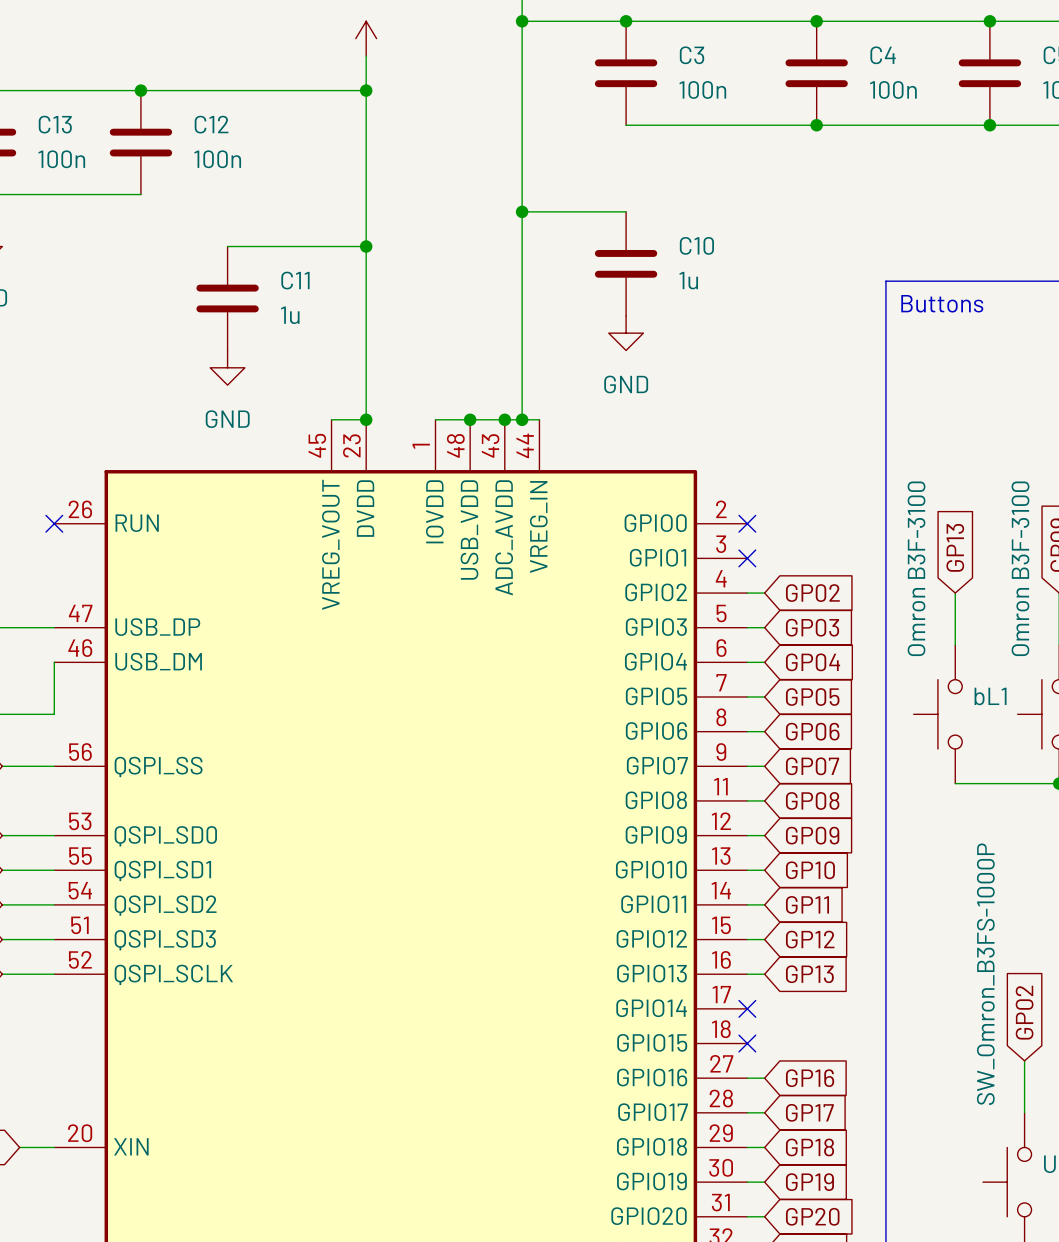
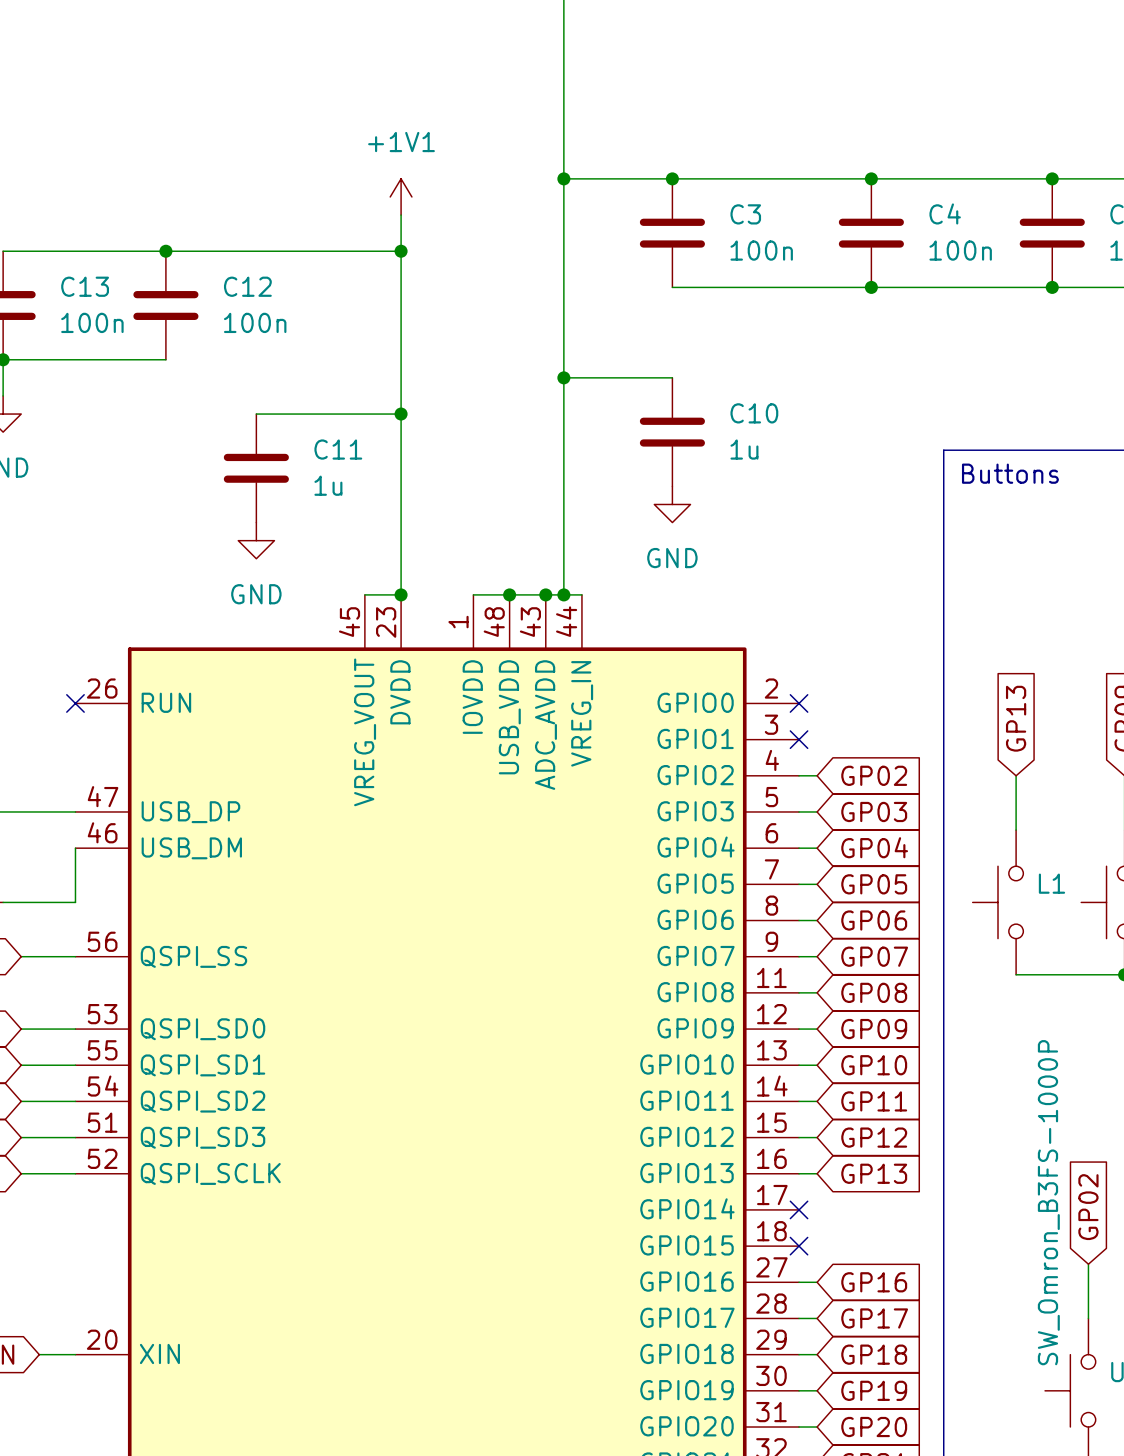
bL1 text: Omron B3F-3100 (916, 568) -> none
part text: Omron B3F-3100 (1020, 568) -> none
bL1 name: bL1 (990, 696) -> L1 (1051, 883)

